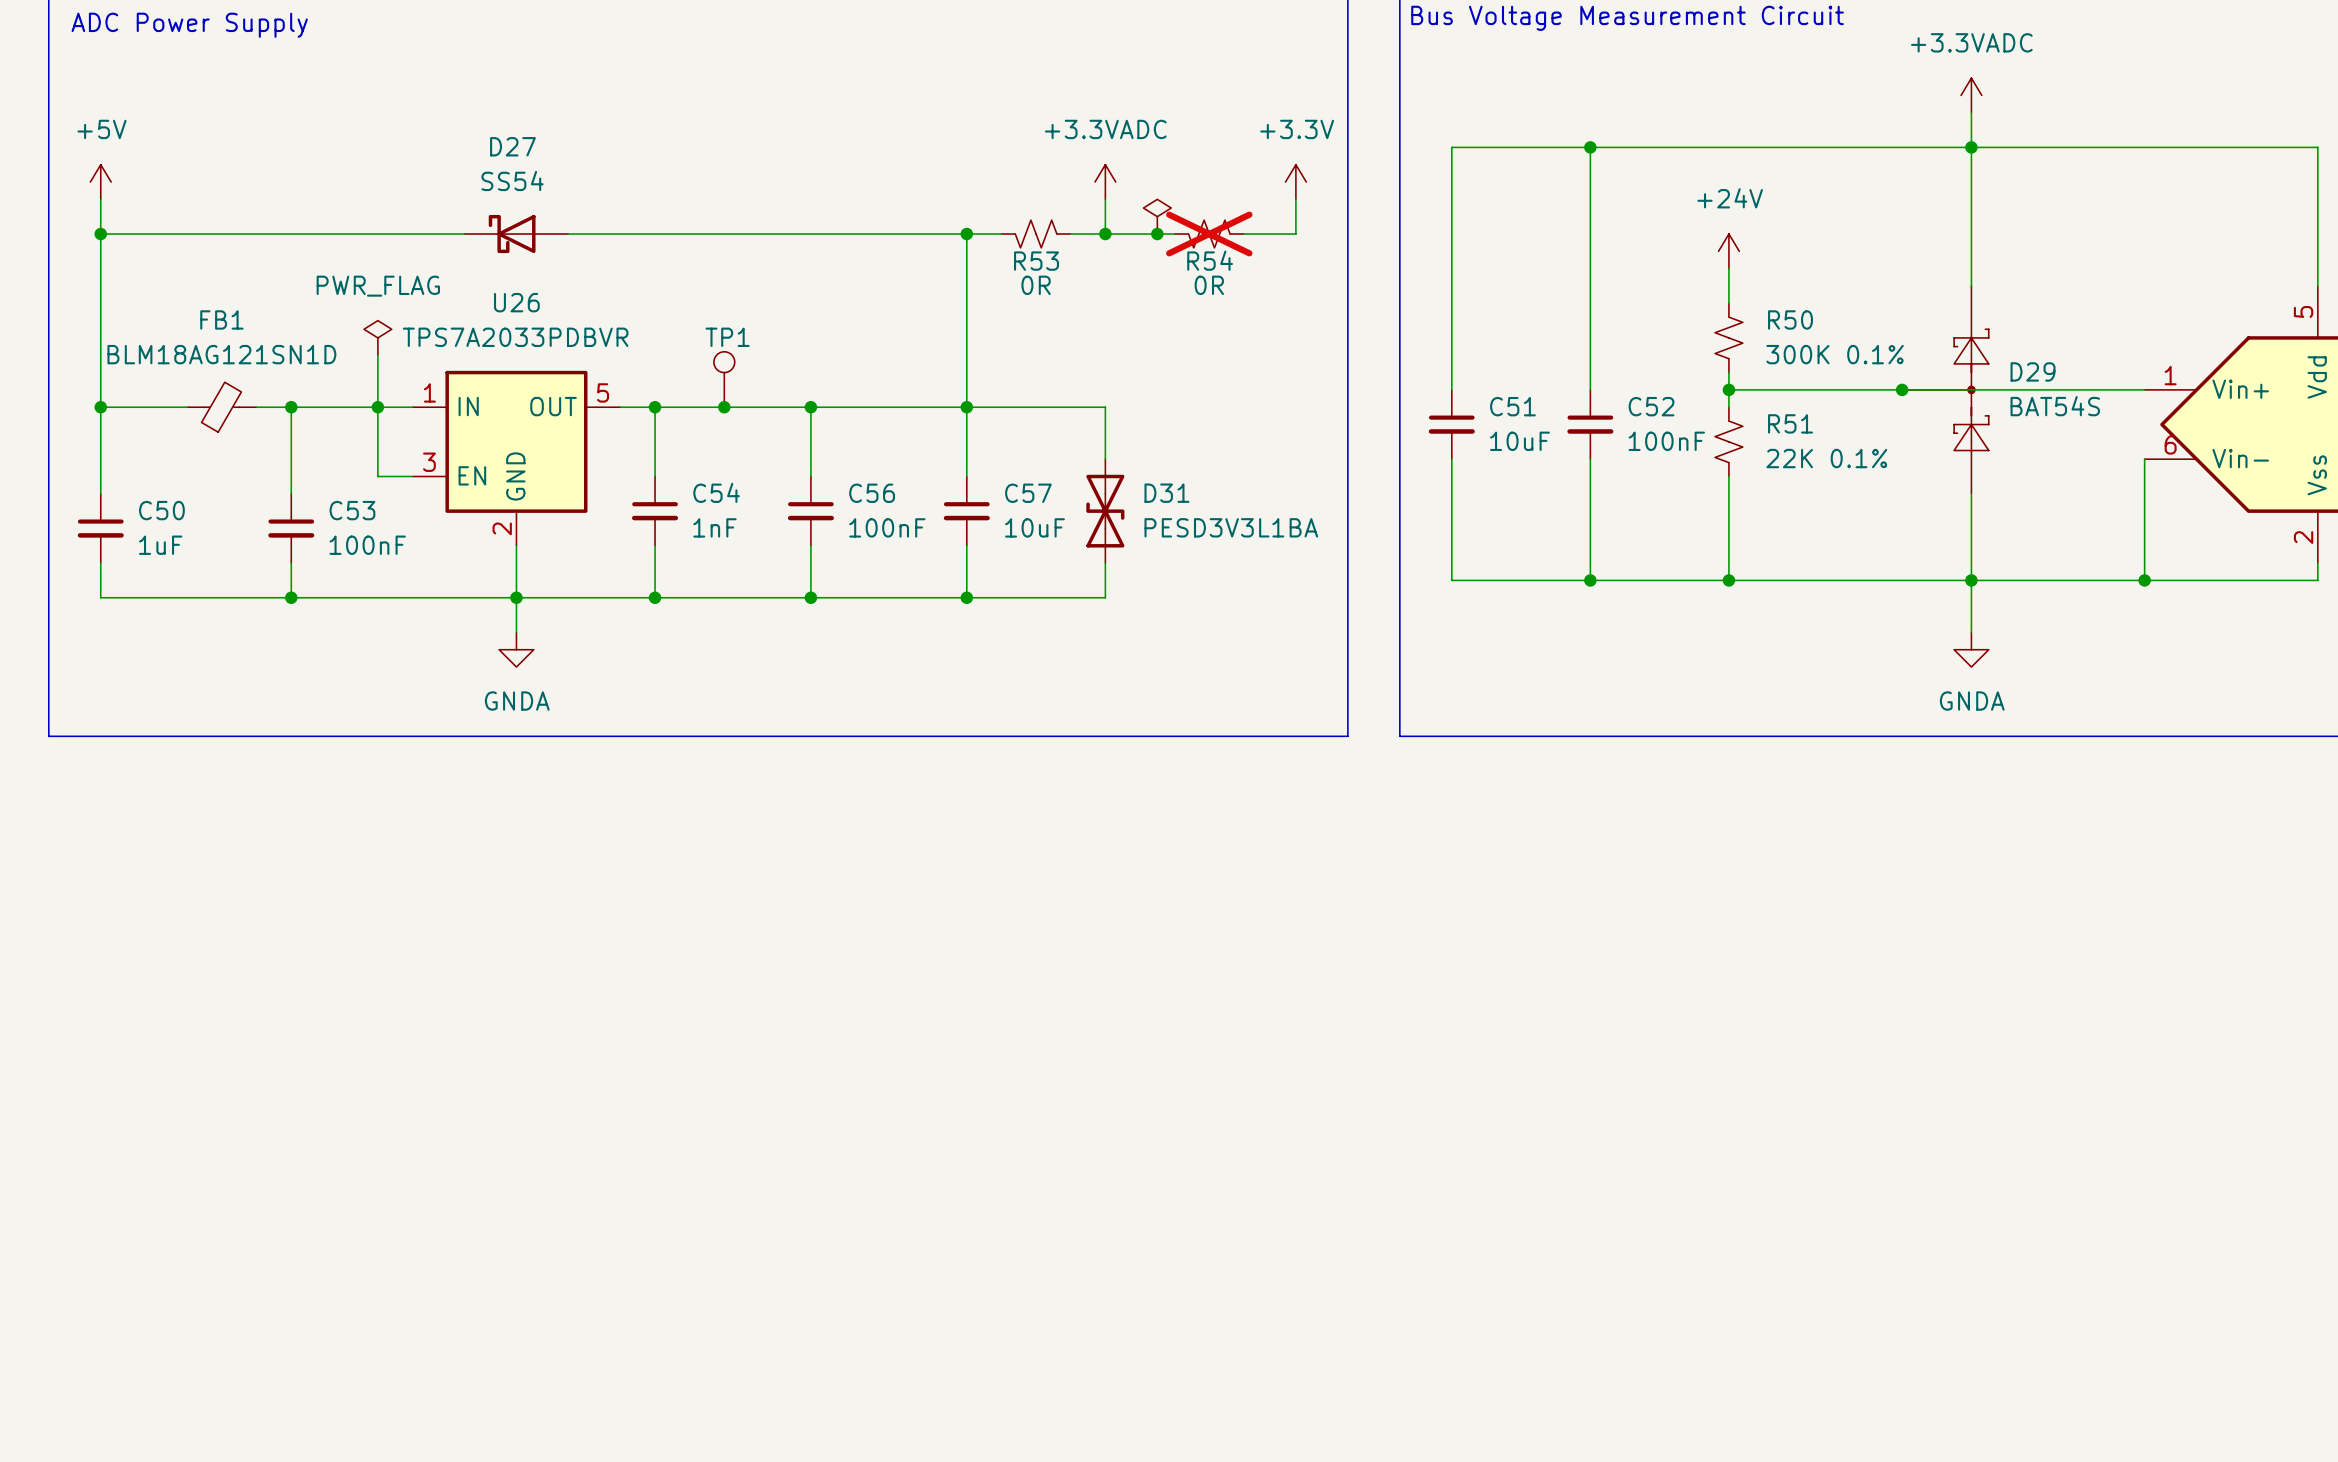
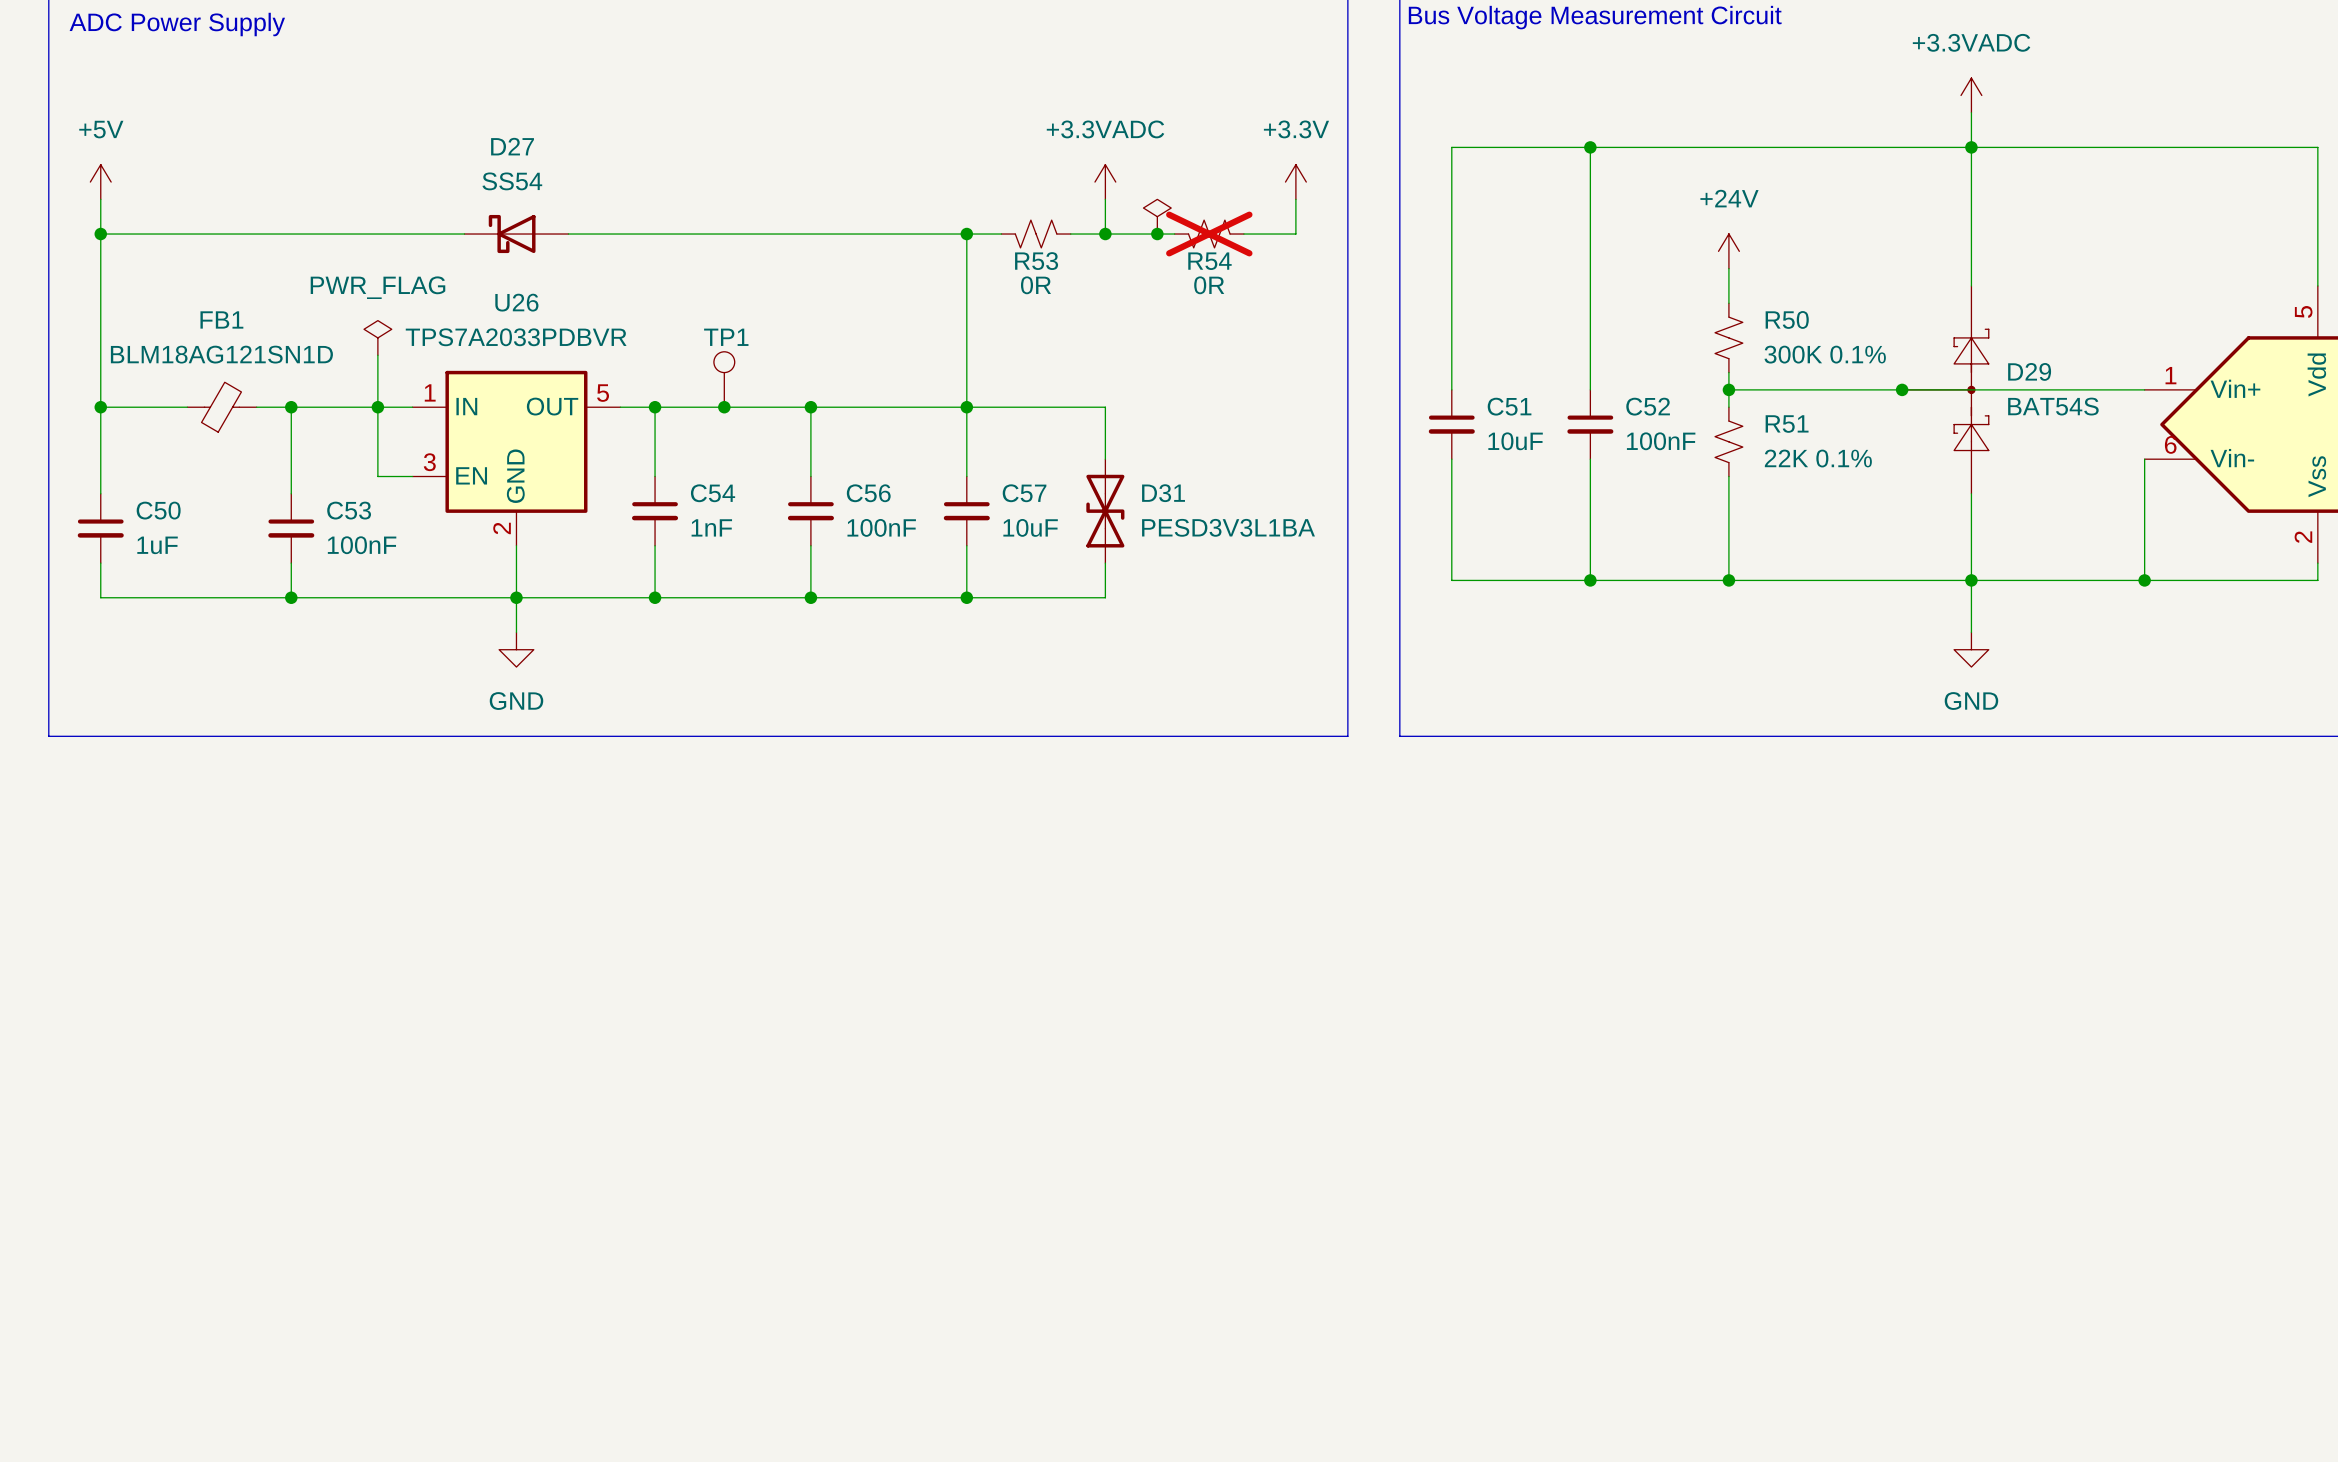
power symbol: GNDA (516, 649) -> GND (516, 649)
power symbol: GNDA (1971, 649) -> GND (1971, 649)

